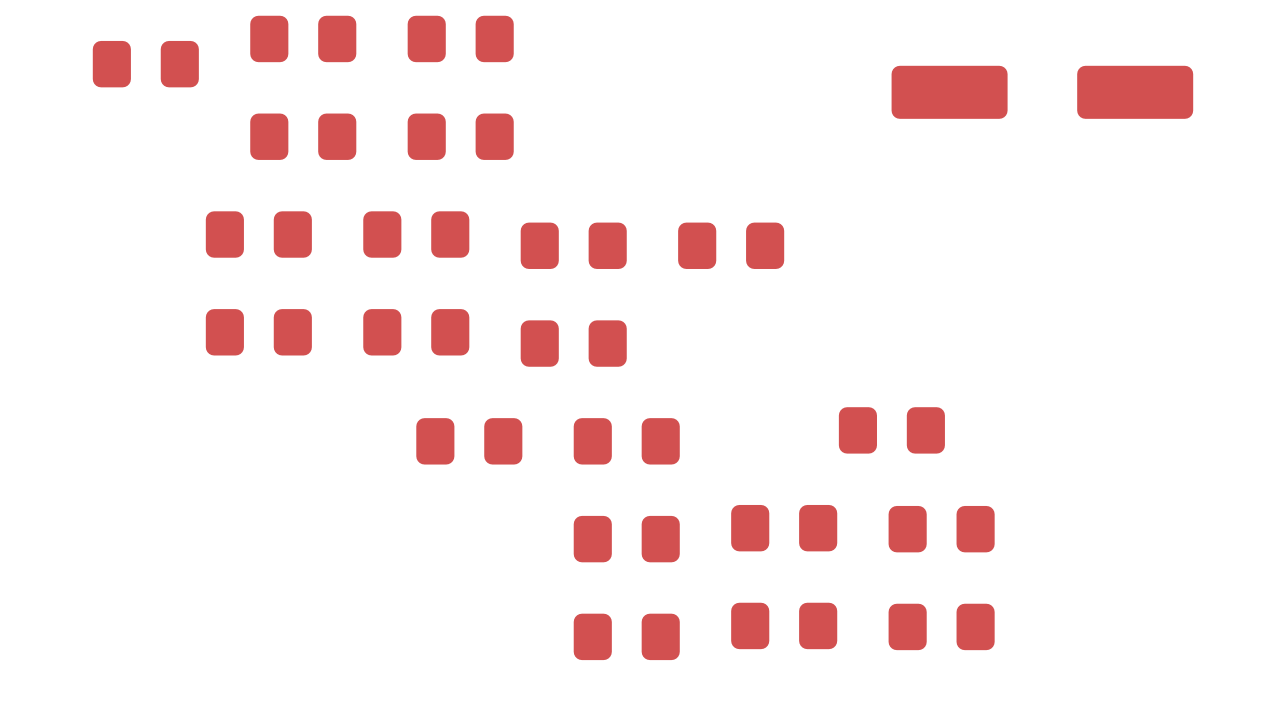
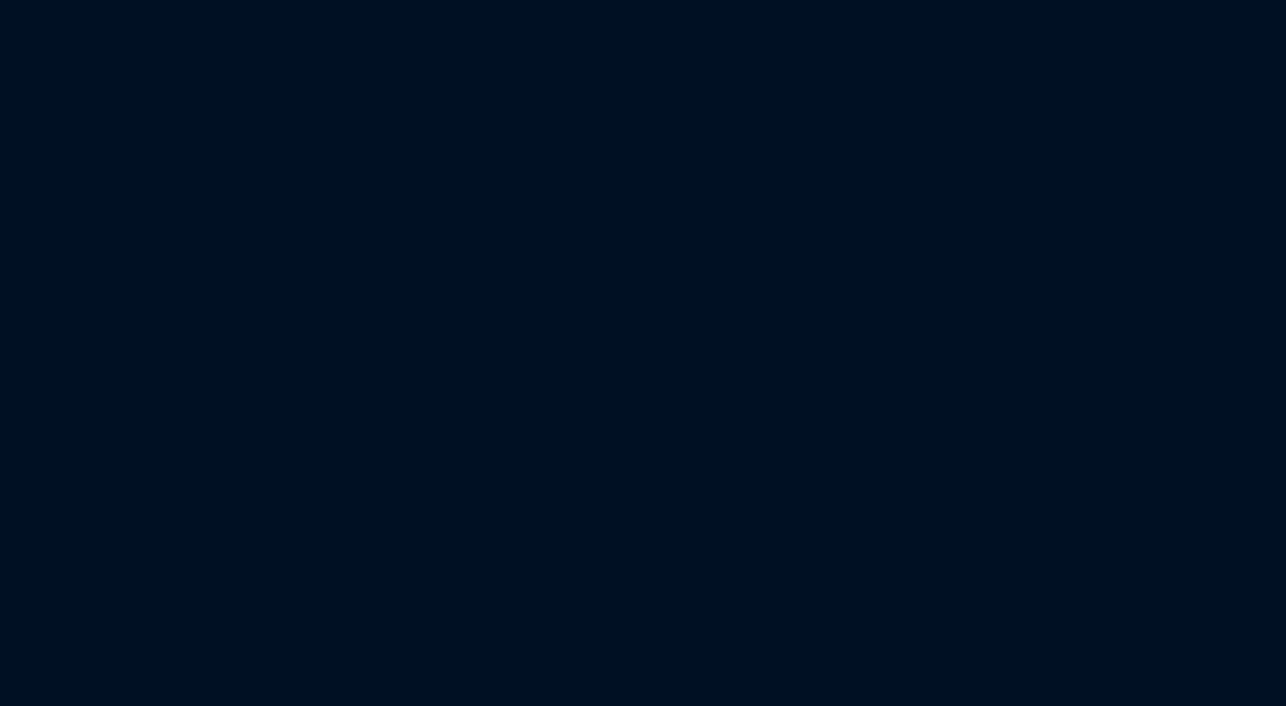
part: (303, 38) -> none
part: (460, 38) -> none
part: (145, 64) -> none
part: (1042, 92) -> none
part: (303, 136) -> none
part: (460, 136) -> none
part: (258, 234) -> none
part: (416, 234) -> none
part: (573, 245) -> none
part: (731, 245) -> none
part: (258, 332) -> none
part: (416, 332) -> none
part: (573, 343) -> none
part: (891, 430) -> none
part: (469, 441) -> none
part: (626, 441) -> none
part: (784, 528) -> none
part: (941, 529) -> none
part: (626, 539) -> none
part: (784, 625) -> none
part: (941, 626) -> none
part: (626, 636) -> none

